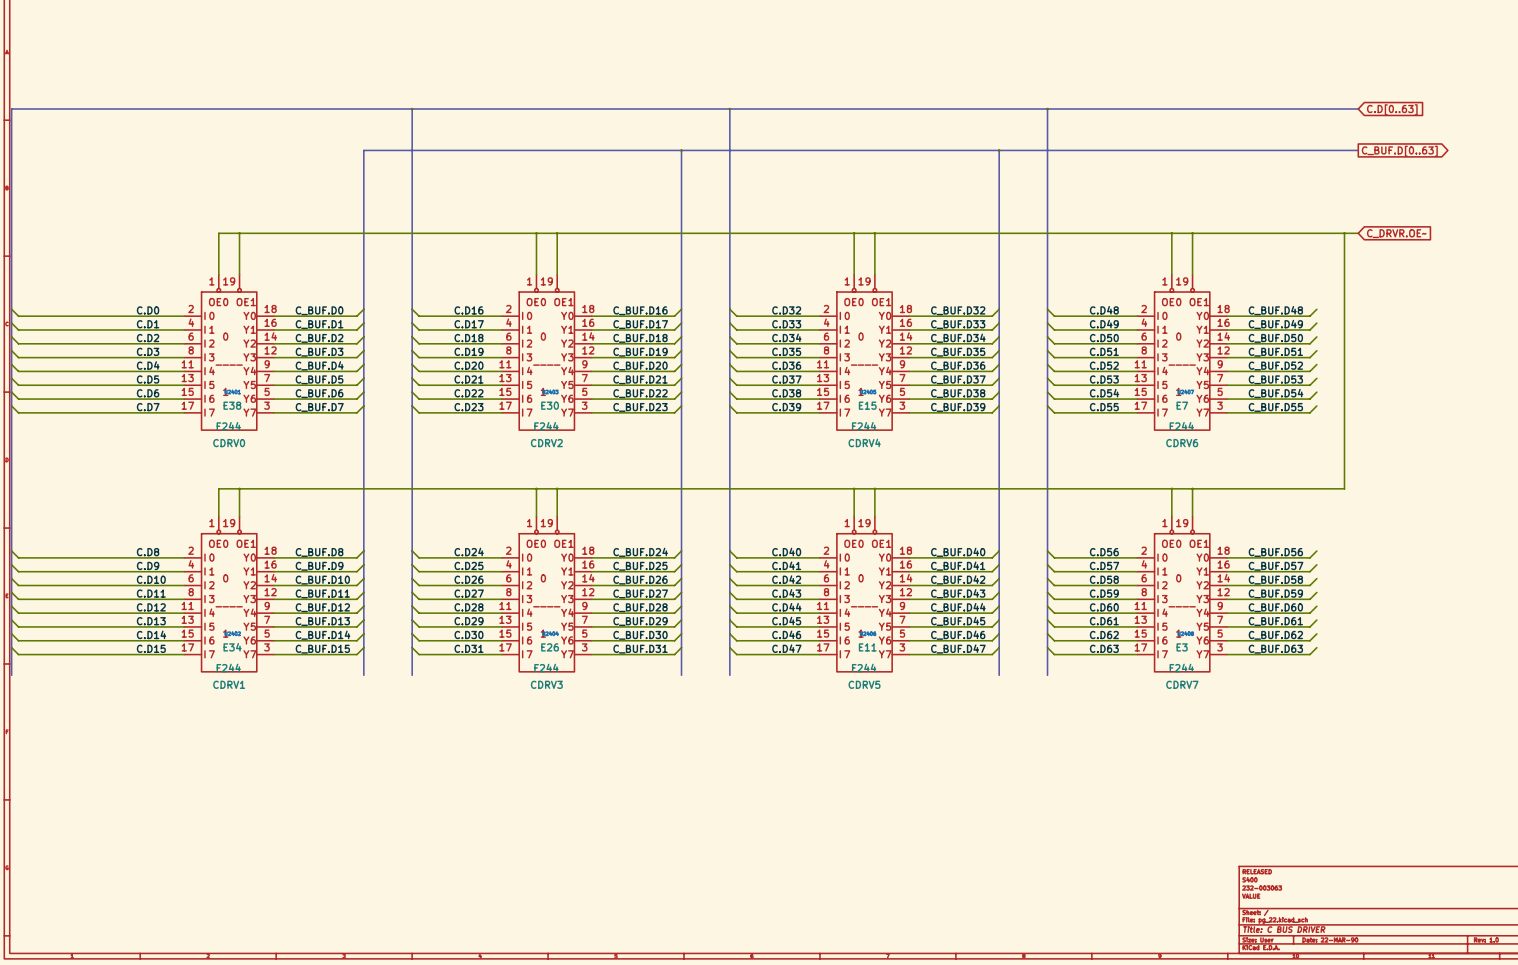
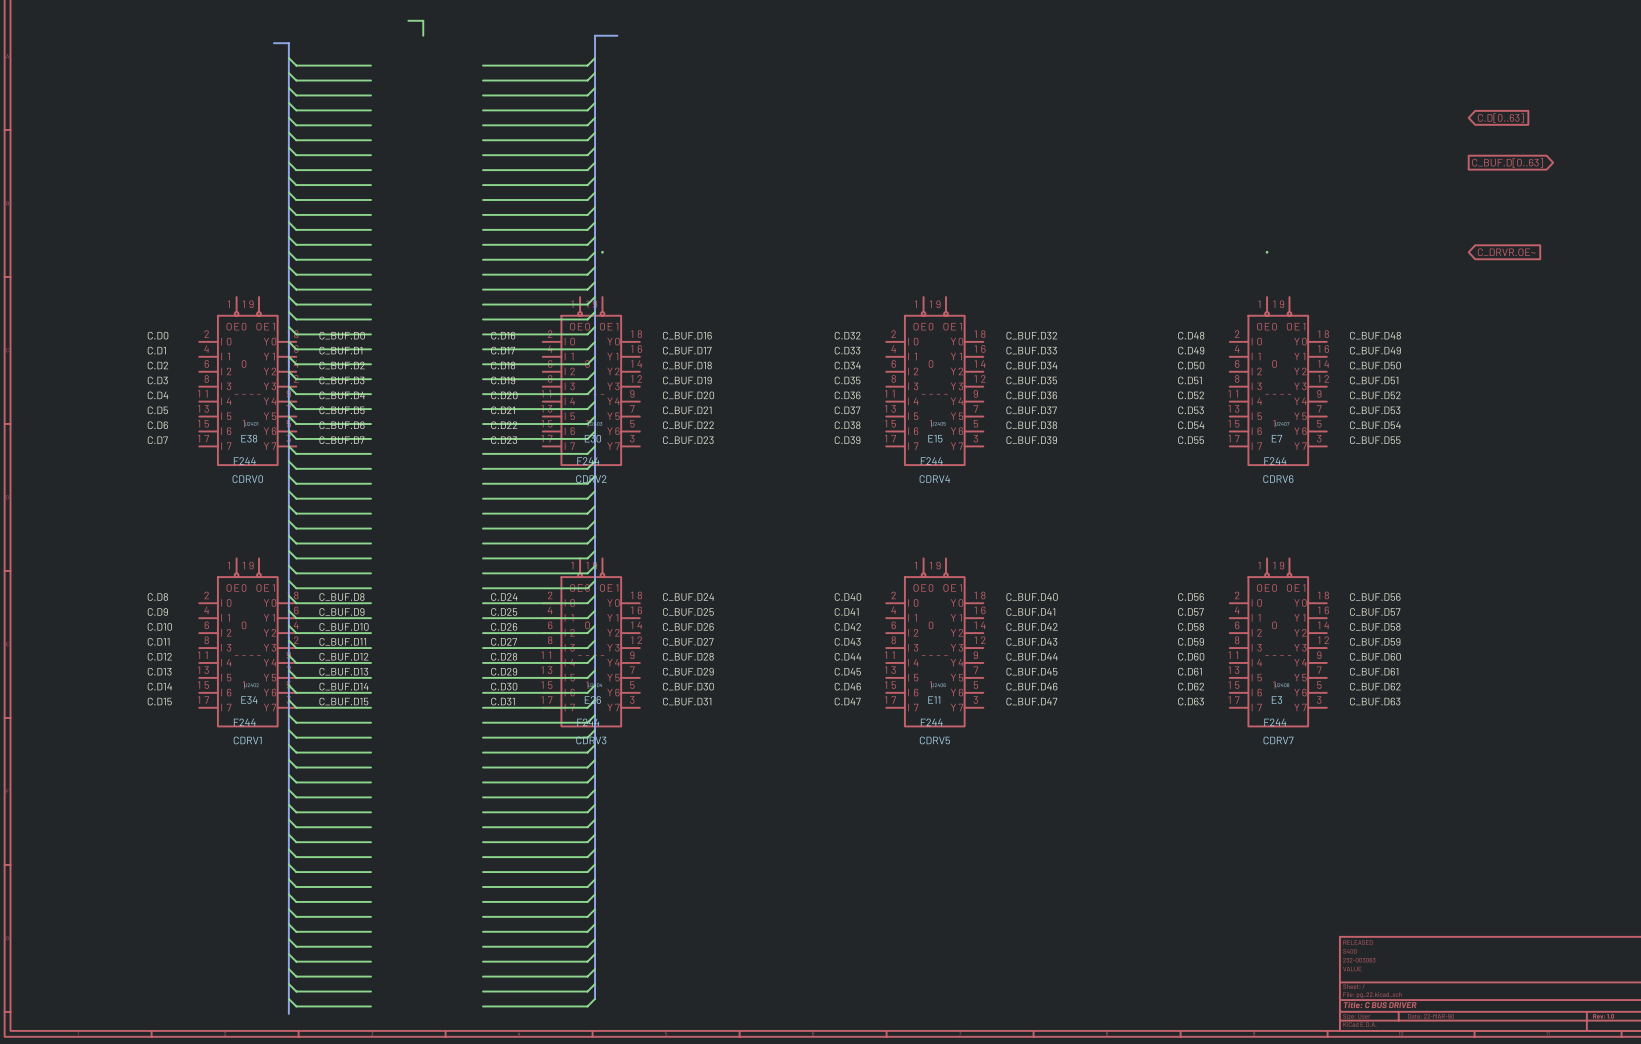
wire: none -> (408, 20) (423, 20) (423, 35)
bus: none -> (617, 35) (595, 35) (595, 998)
bus: none -> (273, 43) (288, 43) (288, 1013)
wire: none -> (288, 58) (296, 65) (371, 65)
wire: none -> (595, 58) (587, 65) (483, 65)
wire: none -> (288, 73) (296, 80) (371, 80)
wire: none -> (595, 73) (587, 80) (483, 80)
wire: none -> (288, 87) (296, 95) (371, 95)
wire: none -> (595, 87) (587, 95) (483, 95)
wire: none -> (288, 102) (296, 110) (371, 110)
wire: none -> (595, 102) (587, 110) (483, 110)
wire: none -> (288, 117) (296, 125) (371, 125)
bus: (412, 109) (412, 675) -> none
junction: (412, 109) -> none
wire: none -> (595, 117) (587, 125) (483, 125)
bus: (729, 109) (729, 675) -> none
junction: (729, 109) -> none
bus: (1047, 109) (1047, 675) -> none
junction: (1047, 109) -> none
bus: (1358, 109) (11, 109) (11, 675) -> none
wire: none -> (288, 132) (296, 140) (371, 140)
wire: none -> (595, 132) (587, 140) (483, 140)
wire: none -> (288, 147) (296, 155) (371, 155)
wire: none -> (595, 147) (587, 155) (483, 155)
wire: none -> (288, 162) (296, 170) (371, 170)
wire: none -> (595, 162) (587, 170) (483, 170)
bus: (681, 150) (681, 675) -> none
junction: (681, 150) -> none
bus: (999, 150) (999, 675) -> none
junction: (999, 150) -> none
bus: (1358, 150) (363, 150) (363, 675) -> none
wire: none -> (288, 177) (296, 185) (371, 185)
wire: none -> (595, 177) (587, 185) (483, 185)
wire: none -> (288, 192) (296, 200) (371, 200)
wire: none -> (595, 192) (587, 200) (483, 200)
wire: none -> (288, 207) (296, 214) (371, 214)
wire: none -> (595, 207) (587, 214) (483, 214)
wire: none -> (288, 222) (296, 229) (371, 229)
wire: none -> (595, 222) (587, 229) (483, 229)
wire: none -> (288, 237) (296, 244) (371, 244)
wire: none -> (595, 237) (587, 244) (483, 244)
wire: (239, 233) (239, 274) -> none
wire: none -> (288, 252) (296, 259) (371, 259)
wire: (536, 233) (536, 274) -> none
wire: none -> (595, 252) (587, 259) (483, 259)
wire: (557, 233) (557, 274) -> none
wire: (854, 233) (854, 274) -> none
wire: (874, 233) (874, 274) -> none
wire: (1171, 233) (1171, 274) -> none
wire: (1192, 233) (1192, 274) -> none
wire: (1344, 233) (1344, 488) (543, 488) -> (595, 521) (587, 528)
wire: (1358, 233) (218, 233) (218, 274) -> none
wire: none -> (288, 267) (296, 274) (371, 274)
wire: none -> (595, 267) (587, 274) (483, 274)
wire: none -> (288, 282) (296, 289) (371, 289)
wire: none -> (595, 282) (587, 289) (483, 289)
wire: none -> (288, 297) (296, 304) (371, 304)
wire: none -> (595, 297) (587, 304) (483, 304)
wire: none -> (288, 312) (296, 319) (371, 319)
wire: none -> (595, 312) (587, 319) (483, 319)
wire: none -> (288, 326) (296, 334) (371, 334)
wire: none -> (595, 326) (587, 334) (483, 334)
wire: (11, 309) (18, 316) (184, 316) -> none
wire: (363, 309) (356, 316) (274, 316) -> none
wire: (412, 309) (419, 316) (501, 316) -> none
wire: (681, 309) (674, 316) (591, 316) -> none
wire: (729, 309) (736, 316) (819, 316) -> none
wire: (999, 309) (992, 316) (909, 316) -> none
wire: (1047, 309) (1054, 316) (1137, 316) -> none
wire: (1316, 309) (1309, 316) (1227, 316) -> none
wire: none -> (288, 341) (296, 349) (371, 349)
wire: none -> (595, 341) (587, 349) (483, 349)
wire: (11, 323) (18, 329) (184, 329) -> none
wire: (363, 323) (356, 329) (274, 329) -> none
wire: (412, 323) (419, 329) (501, 329) -> none
wire: (681, 323) (674, 329) (591, 329) -> none
wire: (729, 323) (736, 329) (819, 329) -> none
wire: (999, 323) (992, 329) (909, 329) -> none
wire: (1047, 323) (1054, 329) (1137, 329) -> none
wire: (1316, 323) (1309, 329) (1227, 329) -> none
wire: none -> (288, 356) (296, 364) (371, 364)
wire: none -> (595, 356) (587, 364) (483, 364)
wire: (11, 336) (18, 343) (184, 343) -> none
wire: (363, 336) (356, 343) (274, 343) -> none
wire: (412, 336) (419, 343) (501, 343) -> none
wire: (681, 336) (674, 343) (591, 343) -> none
wire: (729, 336) (736, 343) (819, 343) -> none
wire: (999, 336) (992, 343) (909, 343) -> none
wire: (1047, 336) (1054, 343) (1137, 343) -> none
wire: (1316, 336) (1309, 343) (1227, 343) -> none
wire: none -> (288, 371) (296, 379) (371, 379)
wire: none -> (595, 371) (587, 379) (483, 379)
wire: (11, 350) (18, 357) (184, 357) -> none
wire: (363, 350) (356, 357) (274, 357) -> none
wire: (412, 350) (419, 357) (501, 357) -> none
wire: (681, 350) (674, 357) (591, 357) -> none
wire: (729, 350) (736, 357) (819, 357) -> none
wire: (999, 350) (992, 357) (909, 357) -> none
wire: (1047, 350) (1054, 357) (1137, 357) -> none
wire: (1316, 350) (1309, 357) (1227, 357) -> none
wire: none -> (288, 386) (296, 394) (371, 394)
wire: none -> (595, 386) (587, 394) (483, 394)
wire: (11, 364) (18, 371) (184, 371) -> none
wire: (363, 364) (356, 371) (274, 371) -> none
wire: (412, 364) (419, 371) (501, 371) -> none
wire: (681, 364) (674, 371) (591, 371) -> none
wire: (729, 364) (736, 371) (819, 371) -> none
wire: (999, 364) (992, 371) (909, 371) -> none
wire: (1047, 364) (1054, 371) (1137, 371) -> none
wire: (1316, 364) (1309, 371) (1227, 371) -> none
wire: none -> (288, 401) (296, 409) (371, 409)
wire: none -> (595, 401) (587, 409) (483, 409)
wire: (11, 378) (18, 385) (184, 385) -> none
wire: (363, 378) (356, 385) (274, 385) -> none
wire: (412, 378) (419, 385) (501, 385) -> none
wire: (681, 378) (674, 385) (591, 385) -> none
wire: (729, 378) (736, 385) (819, 385) -> none
wire: (999, 378) (992, 385) (909, 385) -> none
wire: (1047, 378) (1054, 385) (1137, 385) -> none
wire: (1316, 378) (1309, 385) (1227, 385) -> none
wire: none -> (288, 416) (296, 424) (371, 424)
wire: none -> (595, 416) (587, 424) (483, 424)
wire: (11, 392) (18, 399) (184, 399) -> none
wire: (363, 392) (356, 399) (274, 399) -> none
wire: (412, 392) (419, 399) (501, 399) -> none
wire: (681, 392) (674, 399) (591, 399) -> none
wire: (729, 392) (736, 399) (819, 399) -> none
wire: (999, 392) (992, 399) (909, 399) -> none
wire: (1047, 392) (1054, 399) (1137, 399) -> none
wire: (1316, 392) (1309, 399) (1227, 399) -> none
wire: none -> (288, 431) (296, 438) (371, 438)
wire: none -> (595, 431) (587, 438) (483, 438)
wire: (11, 405) (18, 412) (184, 412) -> none
wire: (363, 405) (356, 412) (274, 412) -> none
wire: (412, 405) (419, 412) (501, 412) -> none
wire: (681, 405) (674, 412) (591, 412) -> none
wire: (729, 405) (736, 412) (819, 412) -> none
wire: (999, 405) (992, 412) (909, 412) -> none
wire: (1047, 405) (1054, 412) (1137, 412) -> none
wire: (1316, 405) (1309, 412) (1227, 412) -> none
wire: none -> (288, 446) (296, 453) (371, 453)
wire: none -> (595, 446) (587, 453) (483, 453)
wire: none -> (288, 461) (296, 468) (371, 468)
wire: none -> (595, 461) (587, 468) (483, 468)
wire: none -> (288, 476) (296, 483) (371, 483)
wire: none -> (595, 476) (587, 483) (483, 483)
wire: none -> (288, 491) (296, 498) (371, 498)
wire: none -> (595, 491) (587, 498) (483, 498)
wire: none -> (288, 506) (296, 513) (371, 513)
wire: none -> (595, 506) (587, 513) (483, 513)
wire: (239, 488) (239, 516) -> none
wire: (274, 488) (218, 488) (218, 516) -> (296, 528) (288, 521)
wire: (343, 488) (446, 488) -> none
wire: (536, 488) (536, 516) -> none
wire: (557, 488) (557, 516) -> none
wire: (854, 488) (854, 516) -> none
wire: (874, 488) (874, 516) -> none
wire: (1171, 488) (1171, 516) -> none
wire: (1192, 488) (1192, 516) -> none
wire: none -> (288, 536) (296, 543) (371, 543)
wire: none -> (595, 536) (587, 543) (483, 543)
wire: none -> (288, 550) (296, 558) (371, 558)
wire: none -> (595, 550) (587, 558) (483, 558)
wire: none -> (288, 565) (296, 573) (371, 573)
wire: none -> (595, 565) (587, 573) (483, 573)
wire: none -> (288, 580) (296, 588) (371, 588)
wire: none -> (595, 580) (587, 588) (483, 588)
wire: (11, 550) (18, 557) (184, 557) -> none
wire: none -> (288, 595) (296, 603)
wire: (363, 550) (356, 557) (343, 557) -> none
wire: (412, 550) (419, 557) (446, 557) -> none
wire: none -> (595, 595) (587, 603) (542, 603)
wire: (681, 550) (674, 557) (591, 557) -> none
wire: (729, 550) (736, 557) (819, 557) -> none
wire: (999, 550) (992, 557) (909, 557) -> none
wire: (1047, 550) (1054, 557) (1137, 557) -> none
wire: (1316, 550) (1309, 557) (1227, 557) -> none
wire: (11, 564) (18, 571) (184, 571) -> none
wire: none -> (288, 610) (296, 618)
wire: (363, 564) (356, 571) (343, 571) -> none
wire: (412, 564) (419, 571) (446, 571) -> none
wire: none -> (595, 610) (587, 618) (542, 618)
wire: (681, 564) (674, 571) (591, 571) -> none
wire: (729, 564) (736, 571) (819, 571) -> none
wire: (999, 564) (992, 571) (909, 571) -> none
wire: (1047, 564) (1054, 571) (1137, 571) -> none
wire: (1316, 564) (1309, 571) (1227, 571) -> none
wire: (11, 578) (18, 585) (184, 585) -> none
wire: none -> (288, 625) (296, 633)
wire: (363, 578) (356, 585) (343, 585) -> none
wire: (412, 578) (419, 585) (446, 585) -> none
wire: none -> (595, 625) (587, 633) (542, 633)
wire: (681, 578) (674, 585) (591, 585) -> none
wire: (729, 578) (736, 585) (819, 585) -> none
wire: (999, 578) (992, 585) (909, 585) -> none
wire: (1047, 578) (1054, 585) (1137, 585) -> none
wire: (1316, 578) (1309, 585) (1227, 585) -> none
wire: (11, 592) (18, 599) (184, 599) -> none
wire: none -> (288, 640) (296, 648)
wire: (363, 592) (356, 599) (343, 599) -> none
wire: (412, 592) (419, 599) (446, 599) -> none
wire: none -> (595, 640) (587, 648) (542, 648)
wire: (681, 592) (674, 599) (591, 599) -> none
wire: (729, 592) (736, 599) (819, 599) -> none
wire: (999, 592) (992, 599) (909, 599) -> none
wire: (1047, 592) (1054, 599) (1137, 599) -> none
wire: (1316, 592) (1309, 599) (1227, 599) -> none
wire: (11, 606) (18, 613) (184, 613) -> none
wire: none -> (288, 655) (296, 662)
wire: (363, 606) (356, 613) (343, 613) -> none
wire: (412, 606) (419, 613) (446, 613) -> none
wire: none -> (595, 655) (587, 662) (542, 662)
wire: (681, 606) (674, 613) (591, 613) -> none
wire: (729, 606) (736, 613) (819, 613) -> none
wire: (999, 606) (992, 613) (909, 613) -> none
wire: (1047, 606) (1054, 613) (1137, 613) -> none
wire: (1316, 606) (1309, 613) (1227, 613) -> none
wire: (11, 620) (18, 626) (184, 626) -> none
wire: none -> (288, 670) (296, 677)
wire: (363, 620) (356, 626) (343, 626) -> none
wire: (412, 620) (419, 626) (446, 626) -> none
wire: none -> (595, 670) (587, 677) (542, 677)
wire: (681, 620) (674, 626) (591, 626) -> none
wire: (729, 620) (736, 626) (819, 626) -> none
wire: (999, 620) (992, 626) (909, 626) -> none
wire: (1047, 620) (1054, 626) (1137, 626) -> none
wire: (1316, 620) (1309, 626) (1227, 626) -> none
wire: (11, 633) (18, 640) (184, 640) -> none
wire: none -> (288, 685) (296, 692)
wire: (363, 633) (356, 640) (343, 640) -> none
wire: (412, 633) (419, 640) (446, 640) -> none
wire: none -> (595, 685) (587, 692) (542, 692)
wire: (681, 633) (674, 640) (591, 640) -> none
wire: (729, 633) (736, 640) (819, 640) -> none
wire: (999, 633) (992, 640) (909, 640) -> none
wire: (1047, 633) (1054, 640) (1137, 640) -> none
wire: (1316, 633) (1309, 640) (1227, 640) -> none
wire: (11, 647) (18, 654) (184, 654) -> none
wire: none -> (288, 700) (296, 707)
wire: (363, 647) (356, 654) (343, 654) -> none
wire: (412, 647) (419, 654) (446, 654) -> none
wire: none -> (595, 700) (587, 707) (542, 707)
wire: (681, 647) (674, 654) (591, 654) -> none
wire: (729, 647) (736, 654) (819, 654) -> none
wire: (999, 647) (992, 654) (909, 654) -> none
wire: (1047, 647) (1054, 654) (1137, 654) -> none
wire: (1316, 647) (1309, 654) (1227, 654) -> none
wire: none -> (288, 715) (296, 722) (371, 722)
wire: none -> (595, 715) (587, 722) (483, 722)
wire: none -> (288, 730) (296, 737) (371, 737)
wire: none -> (595, 730) (587, 737) (483, 737)
wire: none -> (288, 745) (296, 752) (371, 752)
wire: none -> (595, 745) (587, 752) (483, 752)
wire: none -> (288, 760) (296, 767) (371, 767)
wire: none -> (595, 760) (587, 767) (483, 767)
wire: none -> (288, 774) (296, 782) (371, 782)
wire: none -> (595, 774) (587, 782) (483, 782)
wire: none -> (288, 789) (296, 797) (371, 797)
wire: none -> (595, 789) (587, 797) (483, 797)
wire: none -> (288, 804) (296, 812) (371, 812)
wire: none -> (595, 804) (587, 812) (483, 812)
wire: none -> (288, 819) (296, 827) (371, 827)
wire: none -> (595, 819) (587, 827) (483, 827)
wire: none -> (288, 834) (296, 842) (371, 842)
wire: none -> (595, 834) (587, 842) (483, 842)
wire: none -> (288, 849) (296, 857) (371, 857)
wire: none -> (595, 849) (587, 857) (483, 857)
wire: none -> (288, 864) (296, 872) (371, 872)
wire: none -> (595, 864) (587, 872) (483, 872)
wire: none -> (288, 879) (296, 886) (371, 886)
wire: none -> (595, 879) (587, 886) (483, 886)
wire: none -> (288, 894) (296, 901) (371, 901)
wire: none -> (595, 894) (587, 901) (483, 901)
wire: none -> (288, 909) (296, 916) (371, 916)
wire: none -> (595, 909) (587, 916) (483, 916)
wire: none -> (288, 924) (296, 931) (371, 931)
wire: none -> (595, 924) (587, 931) (483, 931)
wire: none -> (288, 939) (296, 946) (371, 946)
wire: none -> (595, 939) (587, 946) (483, 946)
wire: none -> (288, 954) (296, 961) (371, 961)
wire: none -> (595, 954) (587, 961) (483, 961)
wire: none -> (288, 969) (296, 976) (371, 976)
wire: none -> (595, 969) (587, 976) (483, 976)
wire: none -> (288, 984) (296, 991) (371, 991)
wire: none -> (595, 984) (587, 991) (483, 991)
wire: none -> (288, 998) (296, 1006) (371, 1006)
wire: none -> (595, 998) (587, 1006) (483, 1006)

